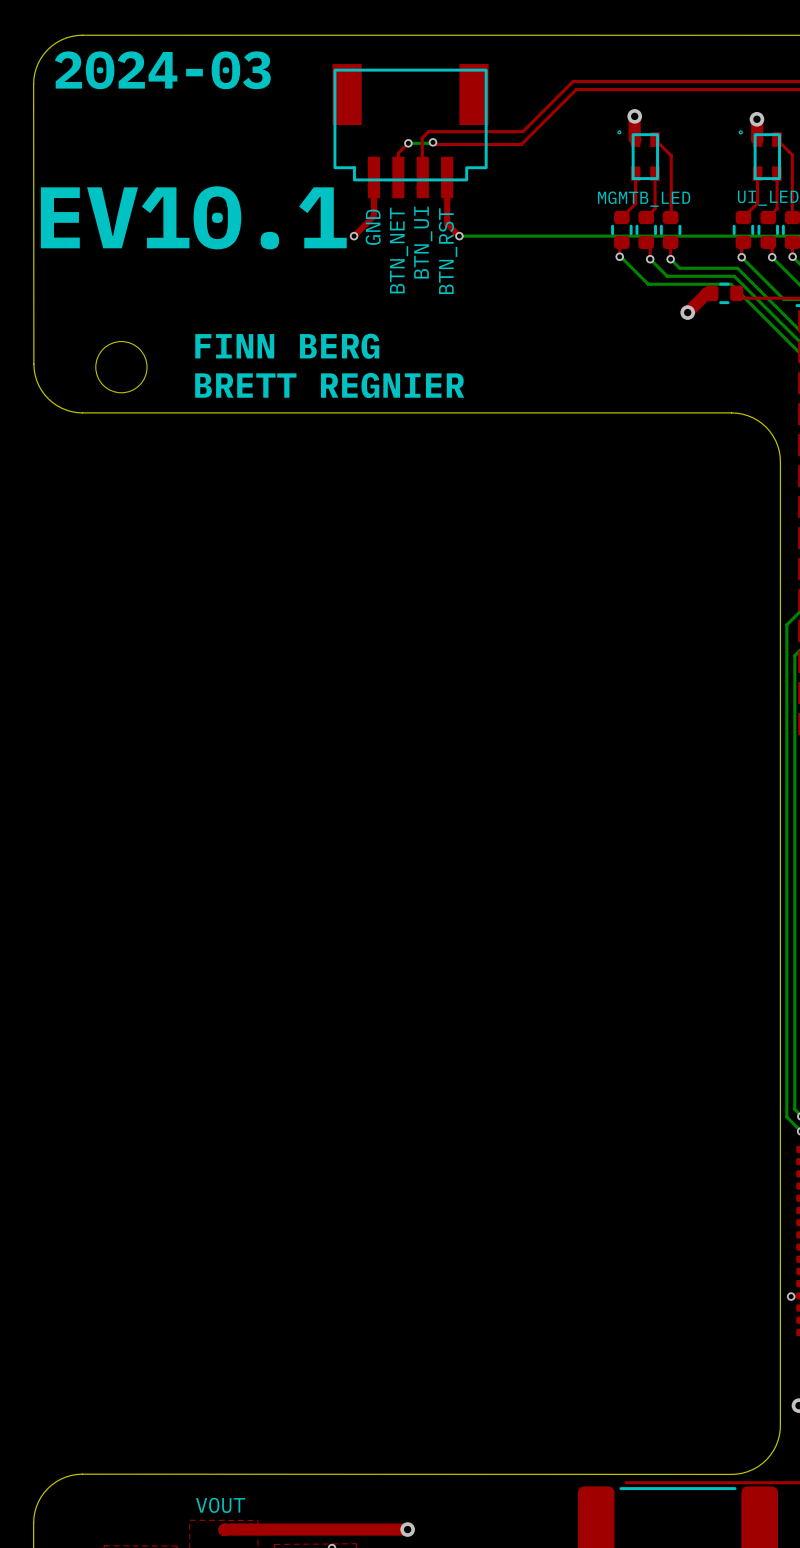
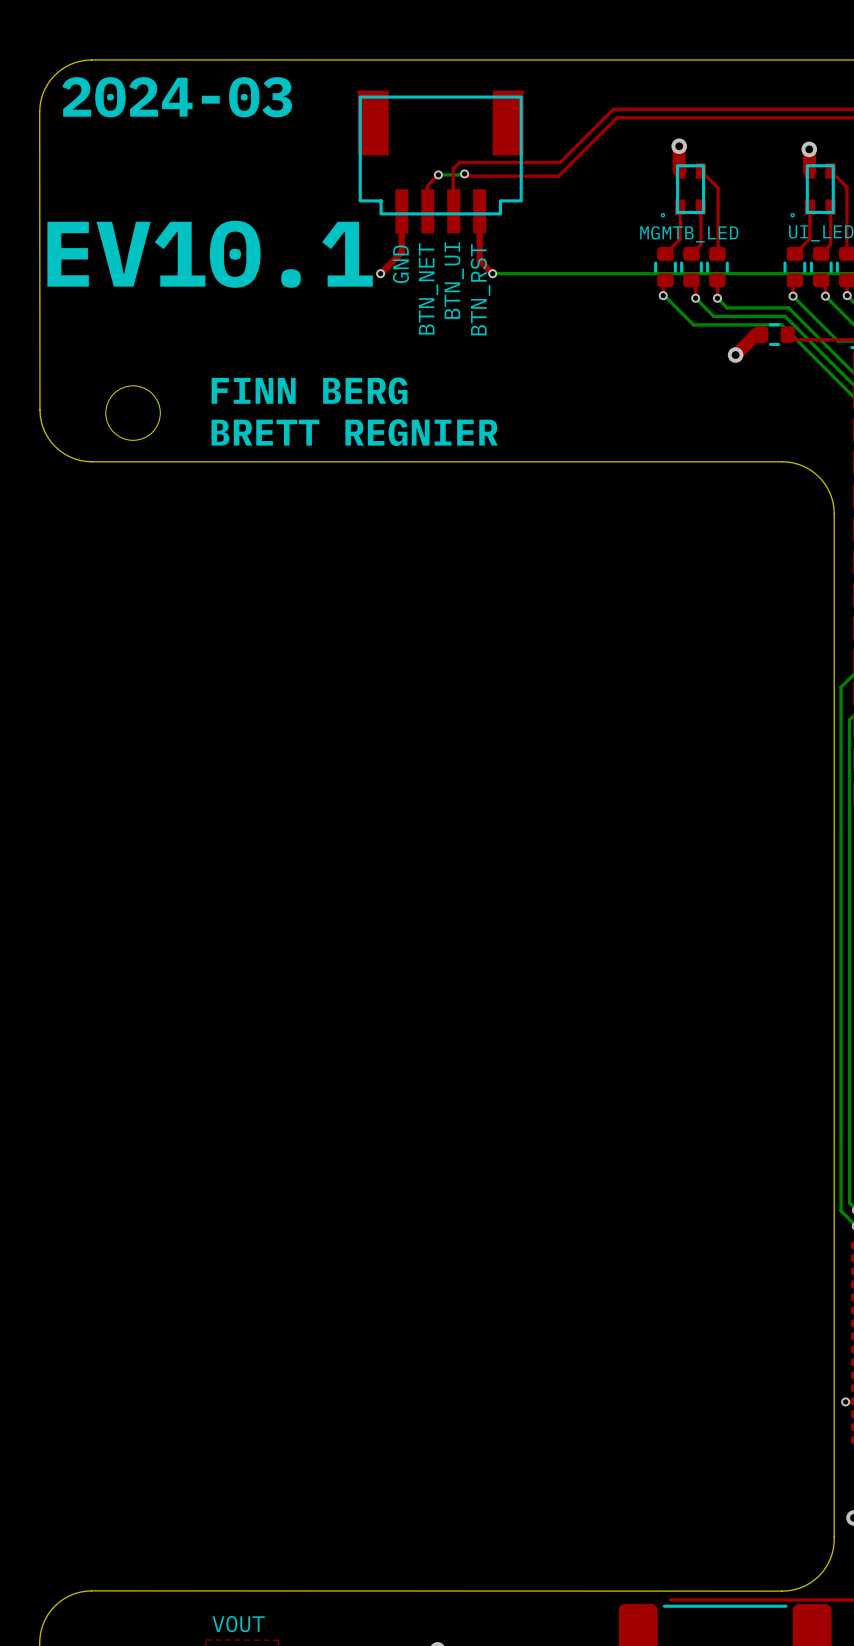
drawing position: (619, 132) -> (662, 215)
drawing position: (740, 132) -> (792, 215)

